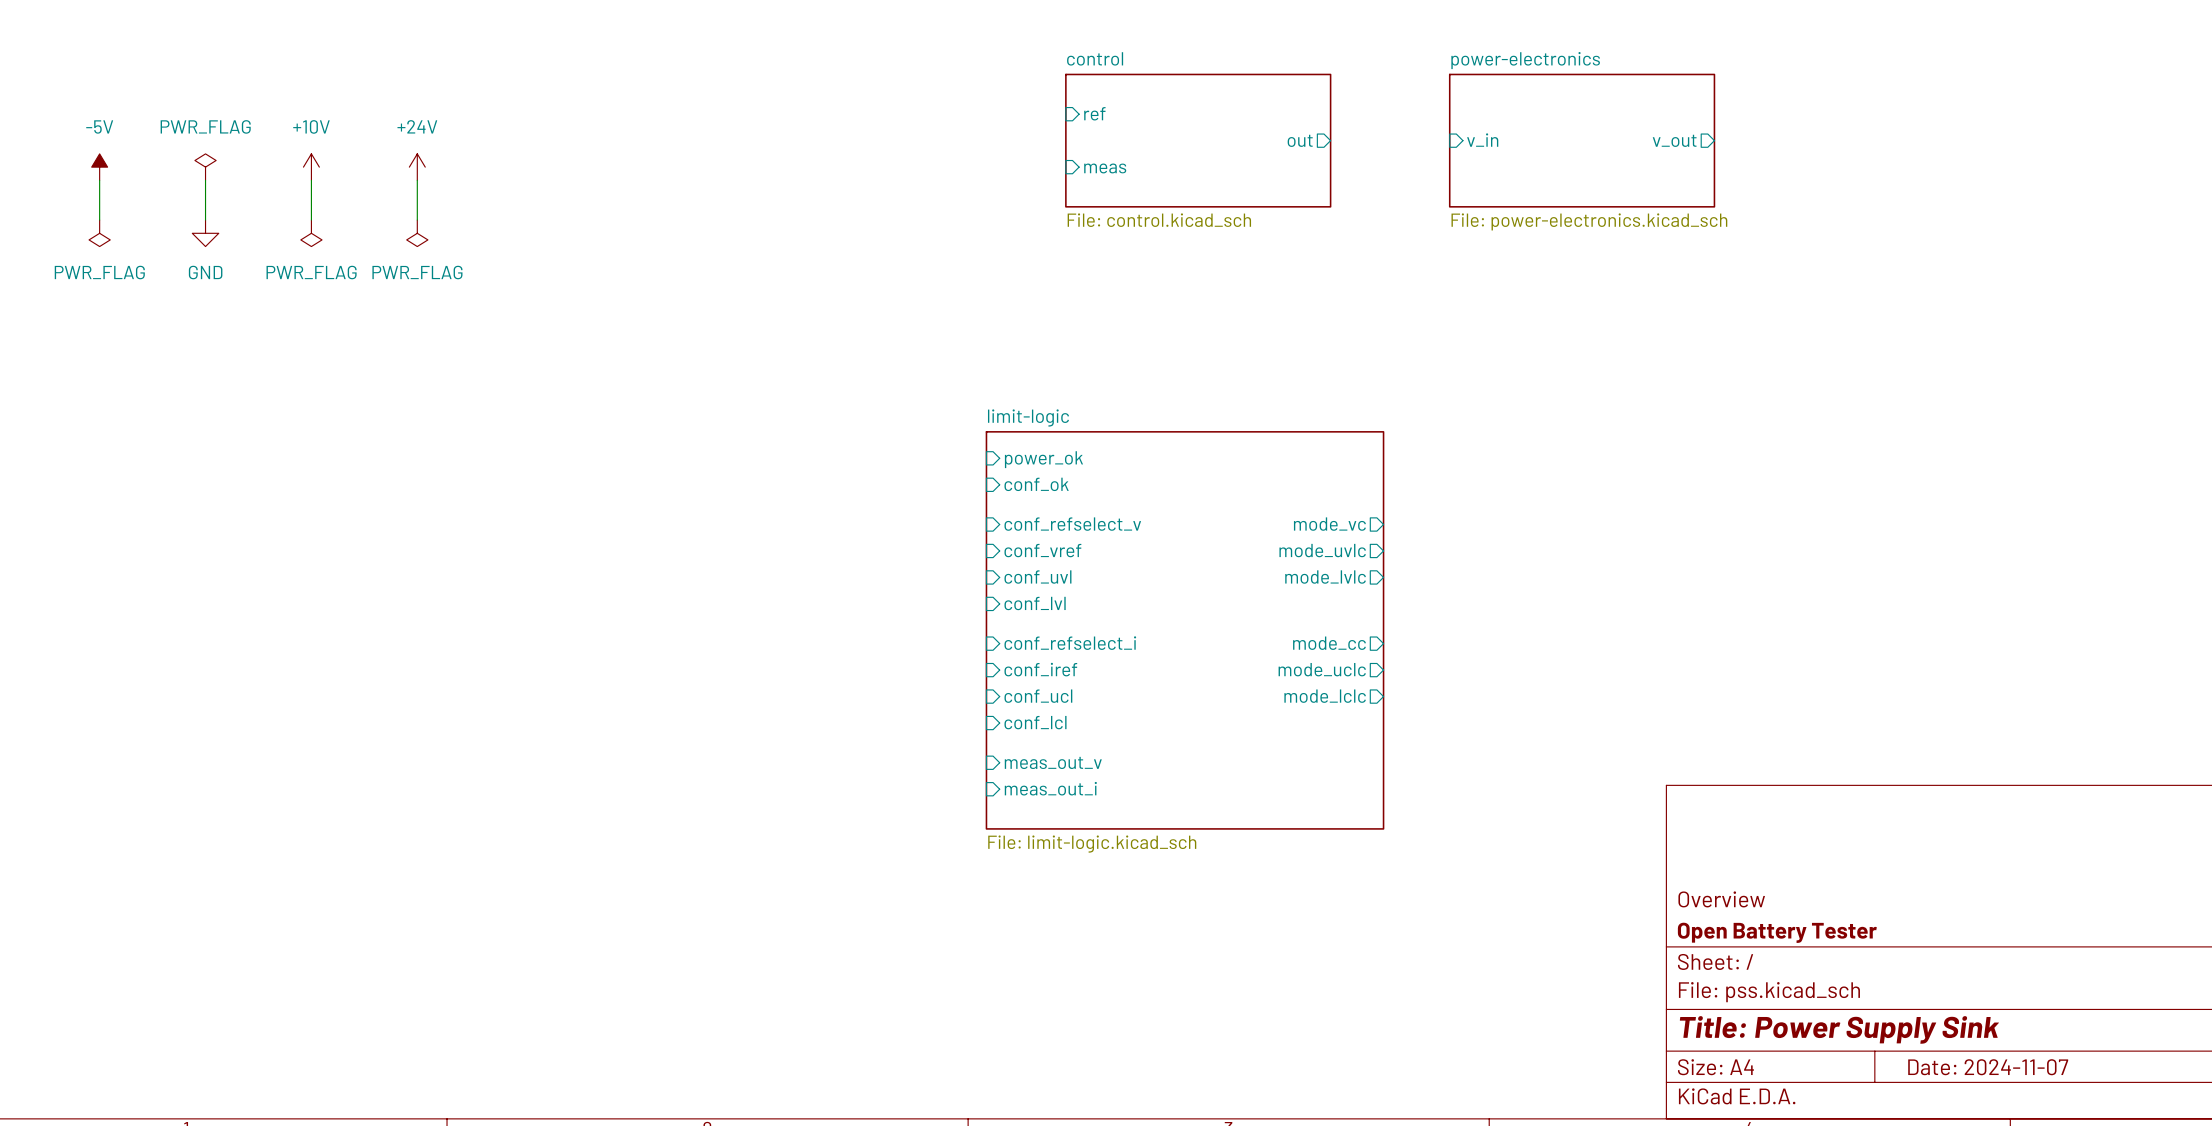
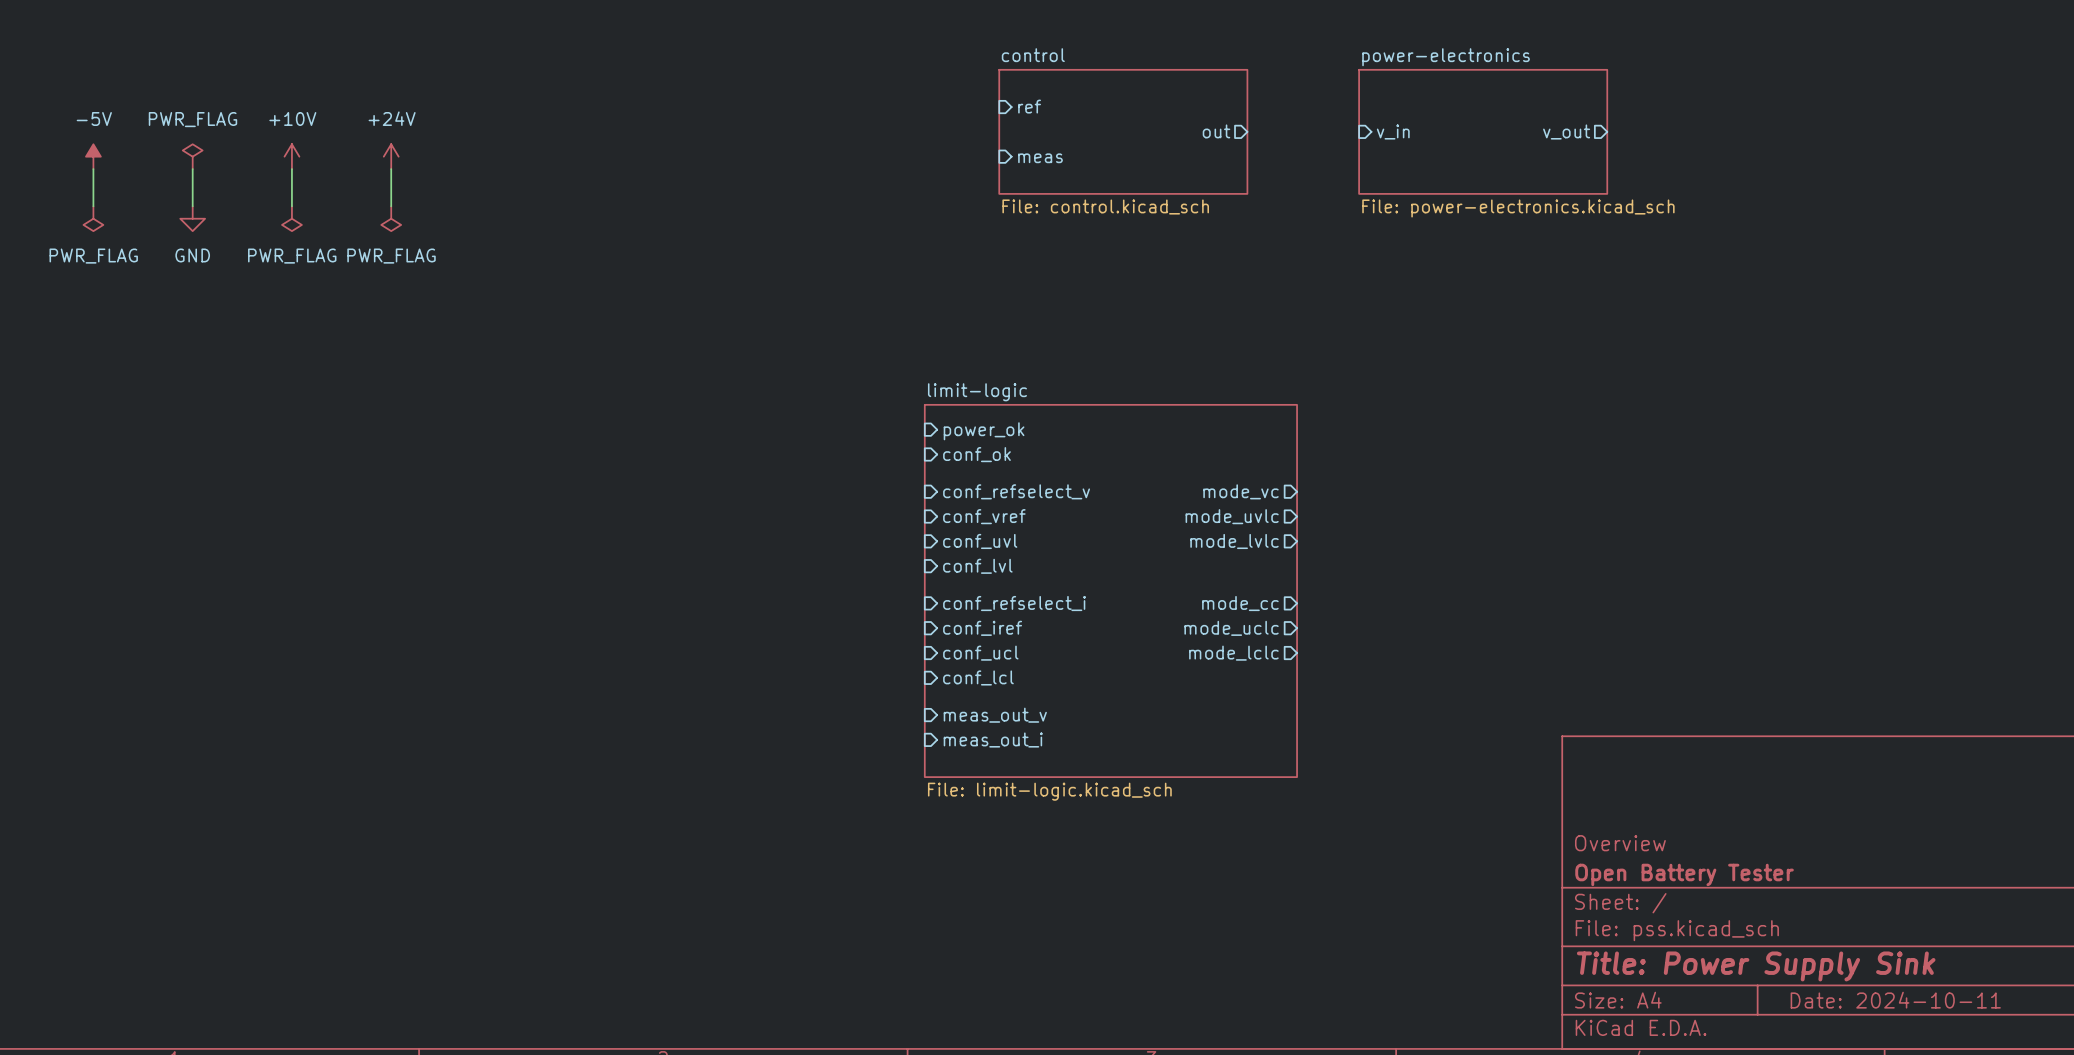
title block: Date: 2024-11-07 (1988, 1067) -> Date: 2024-10-11 (1895, 1000)

